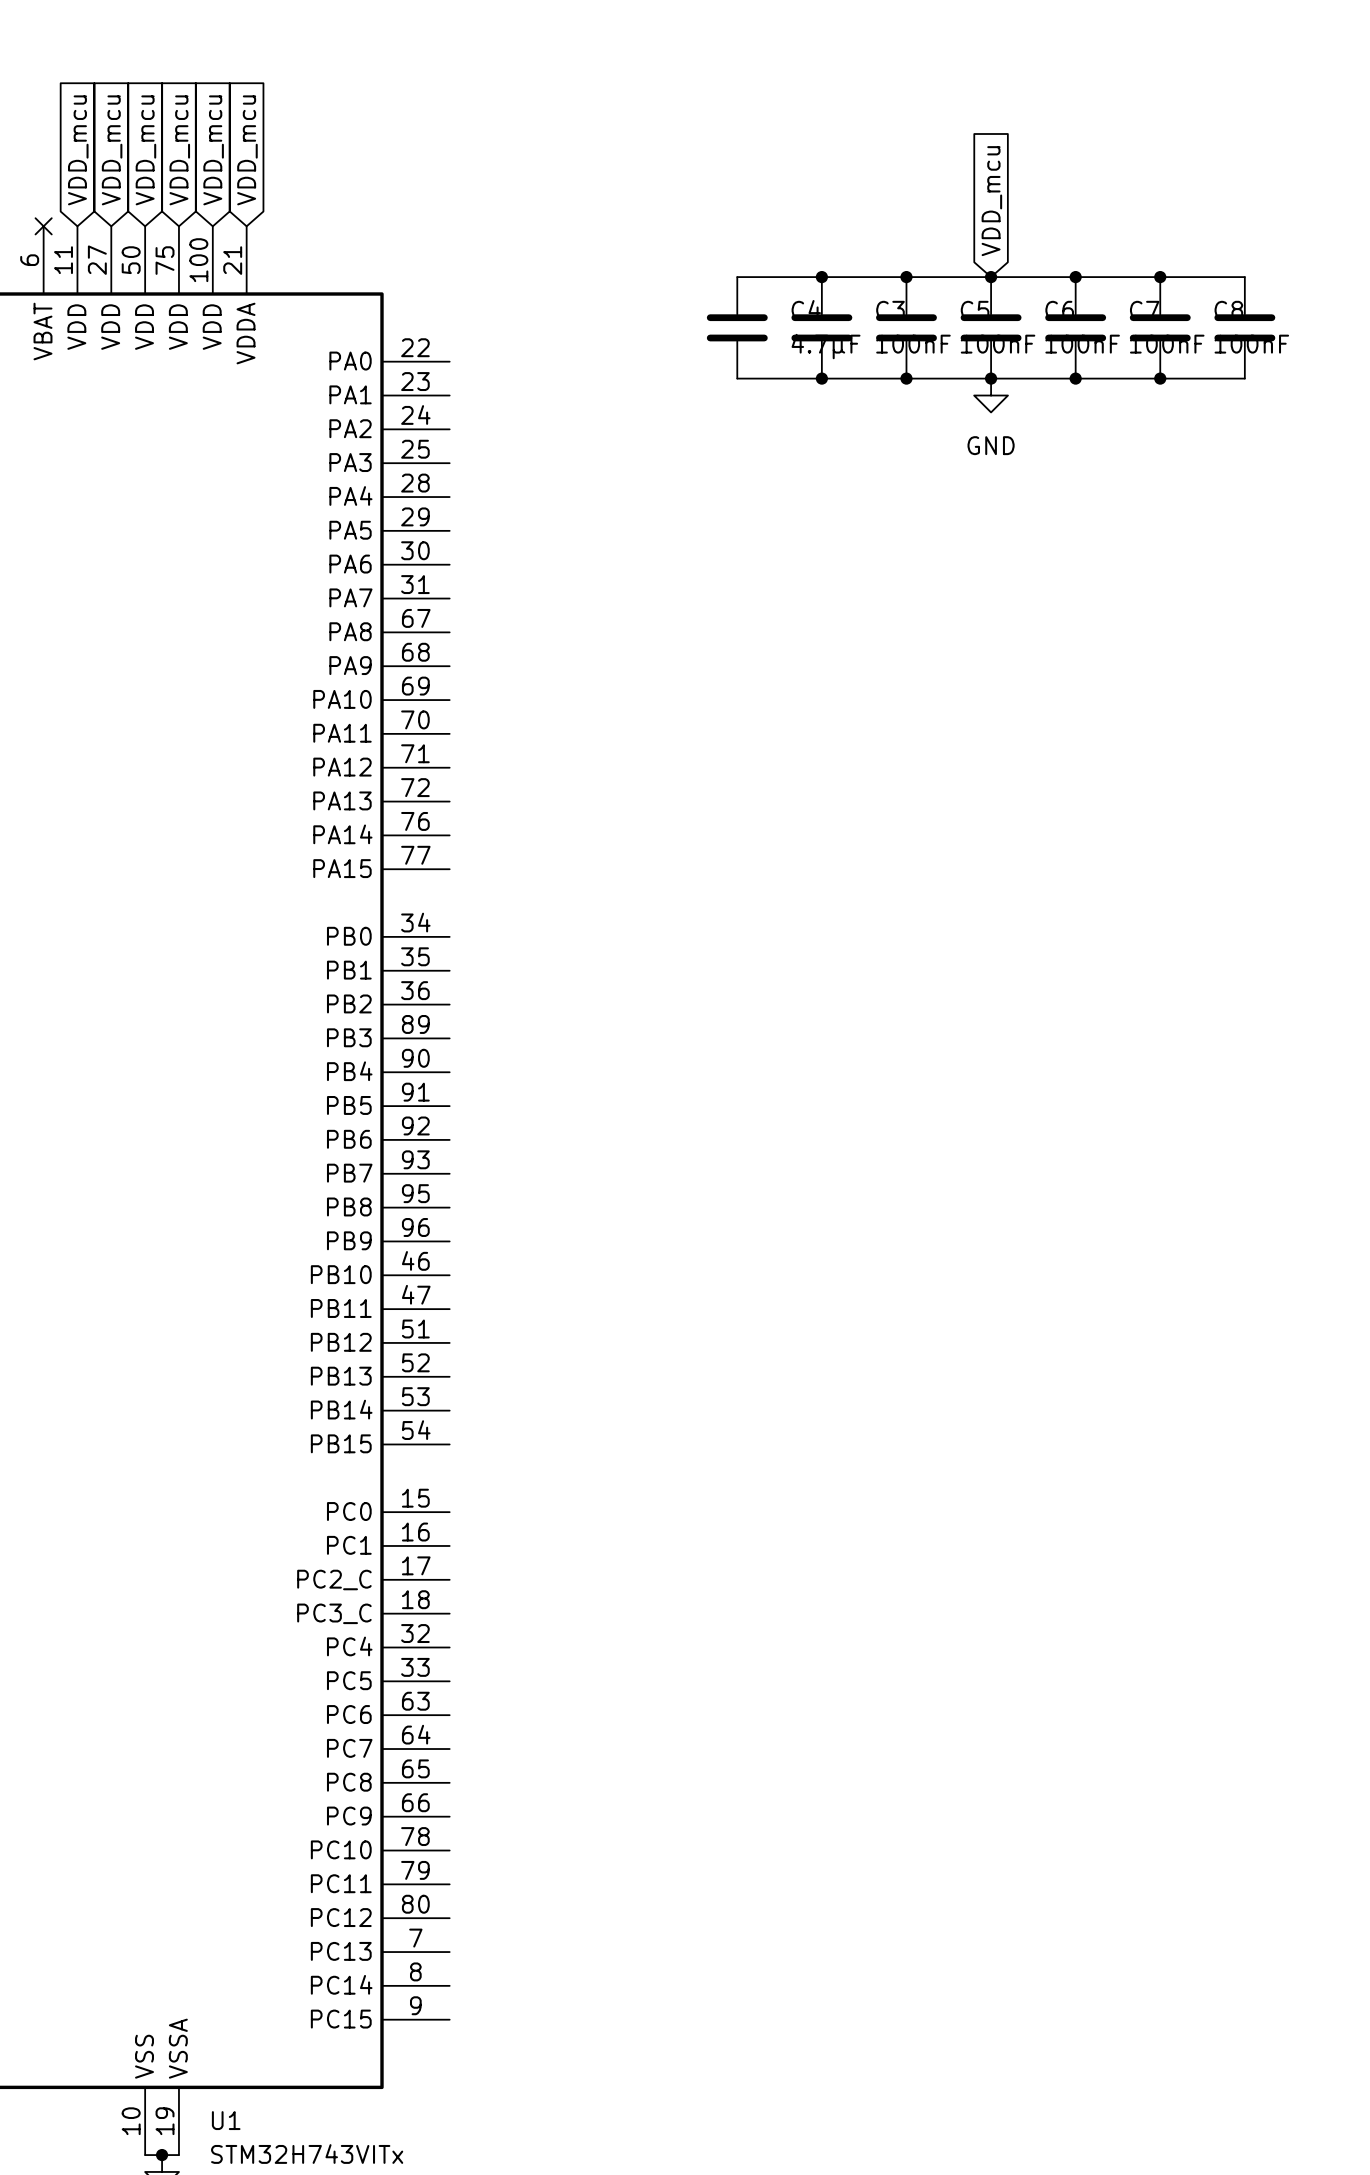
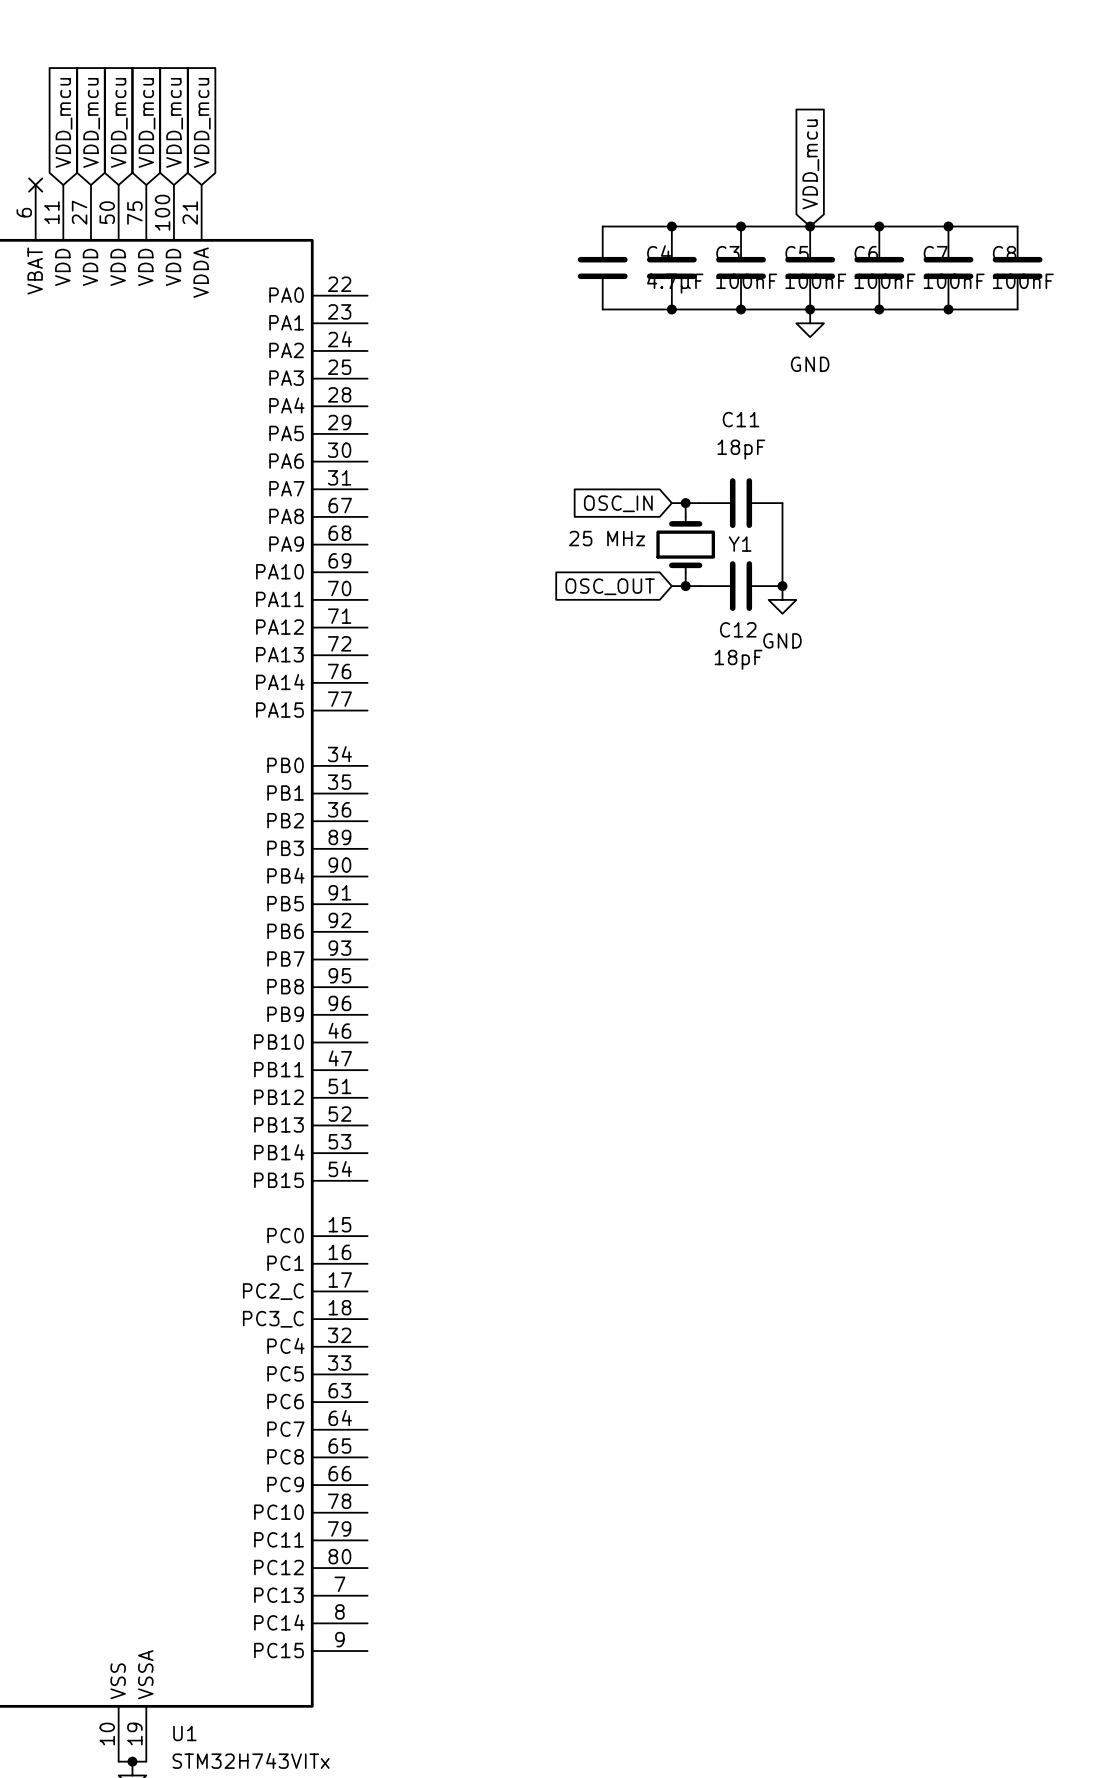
wire: none -> (671, 503) (699, 503)
junction: none -> (685, 503)
C11: none -> 18pF (741, 503)
wire: none -> (782, 503) (782, 586)
global label: none -> OSC_IN (618, 503)
Y1: none -> 25 MHz (685, 544)
wire: none -> (671, 586) (699, 586)
junction: none -> (685, 586)
C12: none -> 18pF (741, 586)
junction: none -> (782, 586)
global label: none -> OSC_OUT (610, 586)
power symbol: none -> GND (782, 599)

